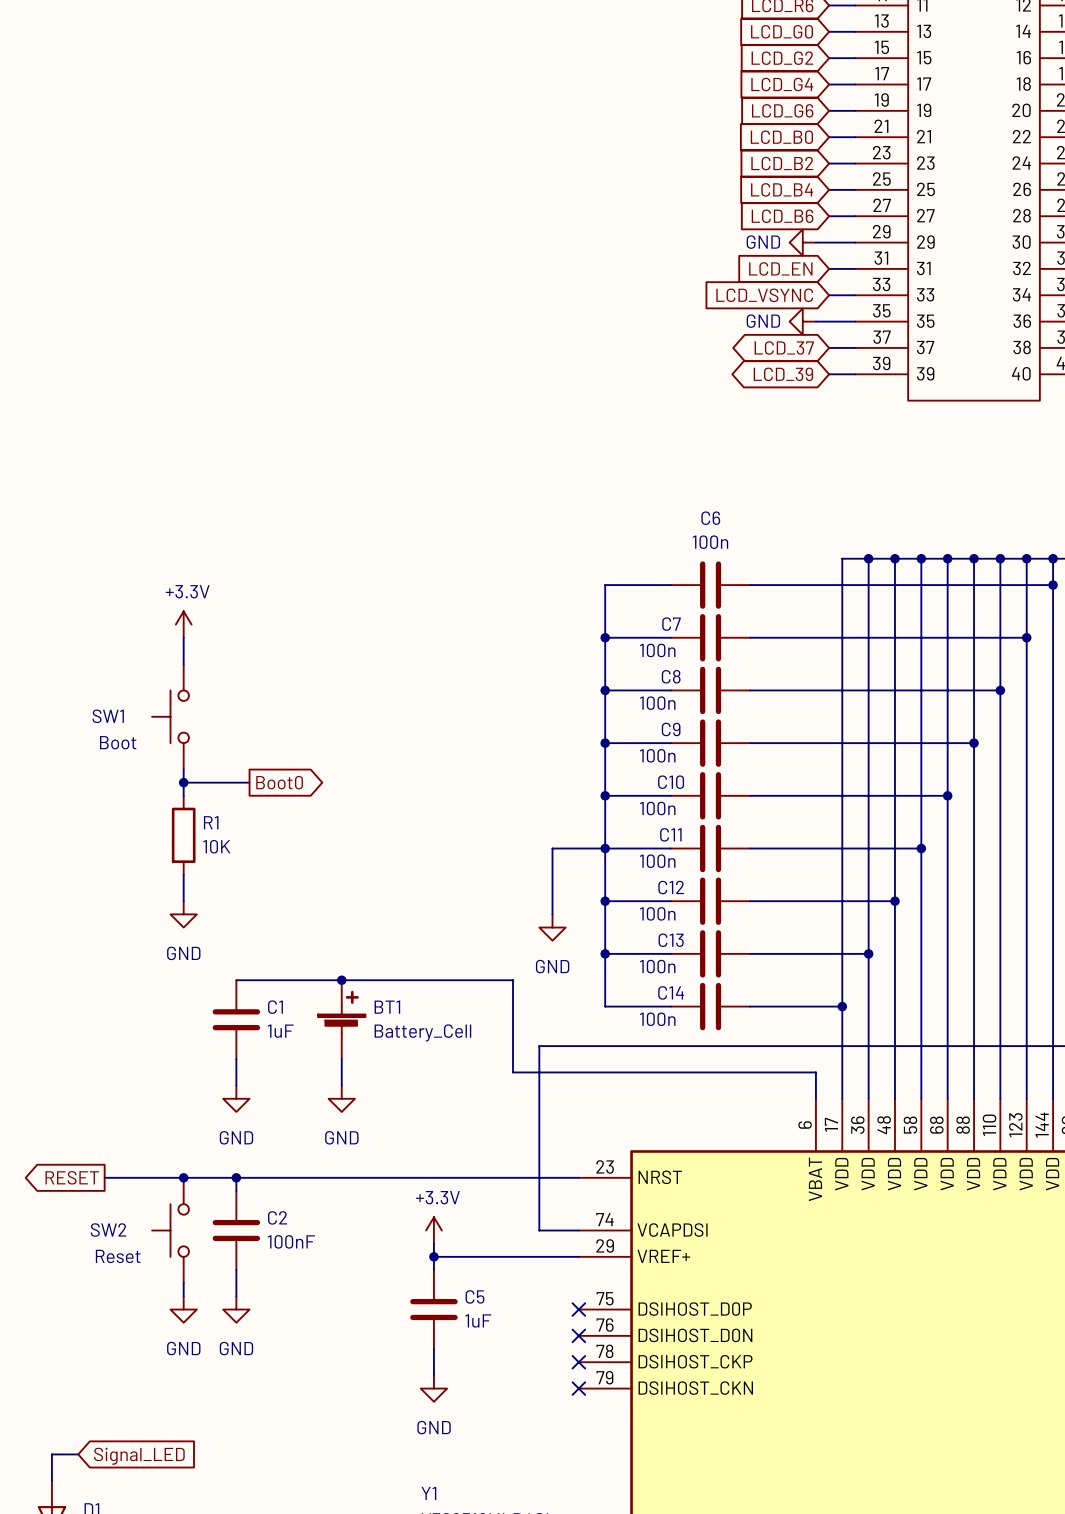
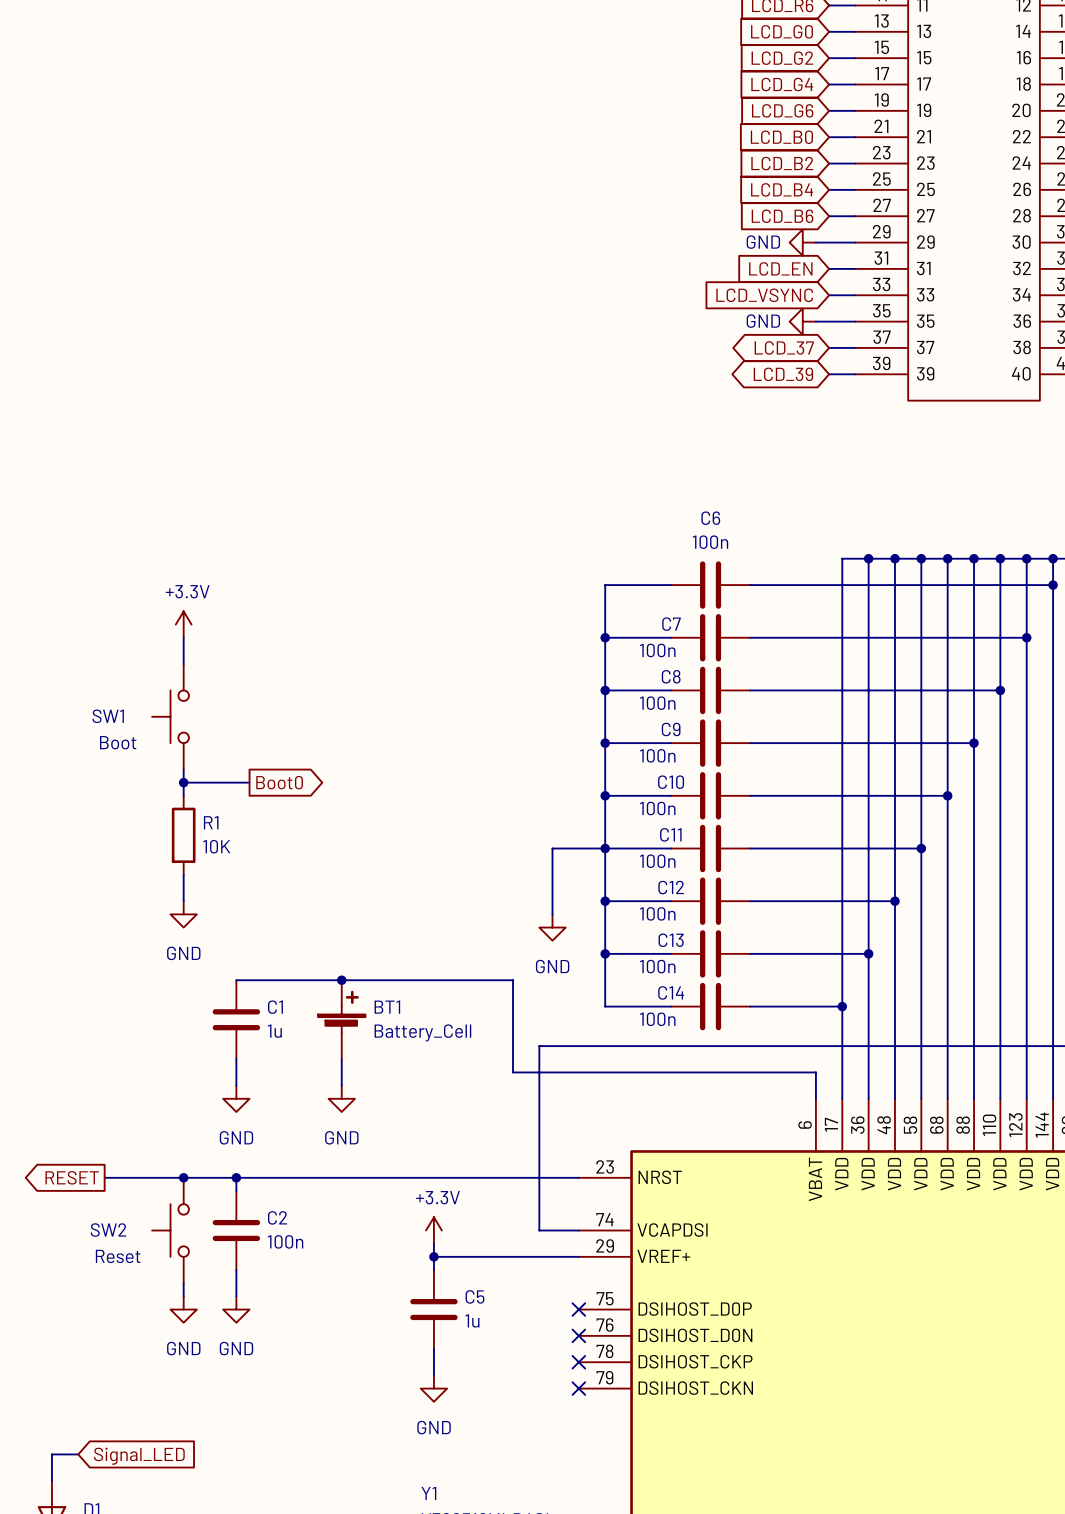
C1 value: 1uF (280, 1031) -> 1u (274, 1031)
C2 value: 100nF (291, 1241) -> 100n (285, 1241)
C5 value: 1uF (478, 1320) -> 1u (472, 1320)

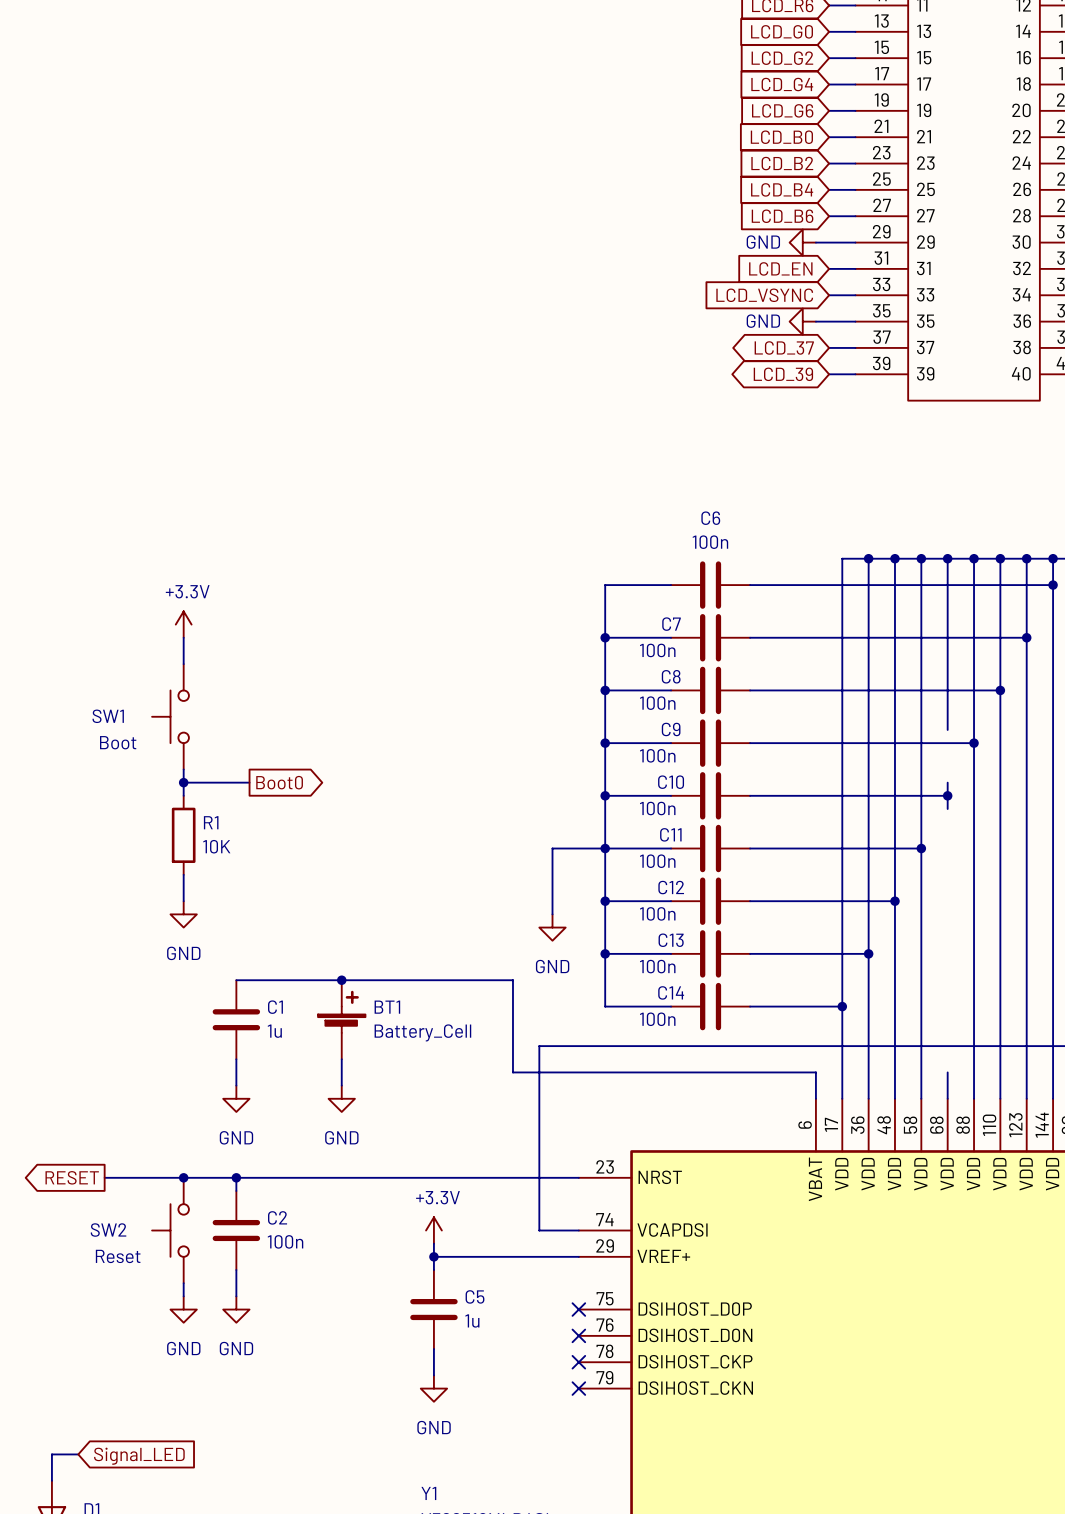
wire: (947, 729) (947, 782) -> none
wire: (947, 808) (947, 1072) -> none

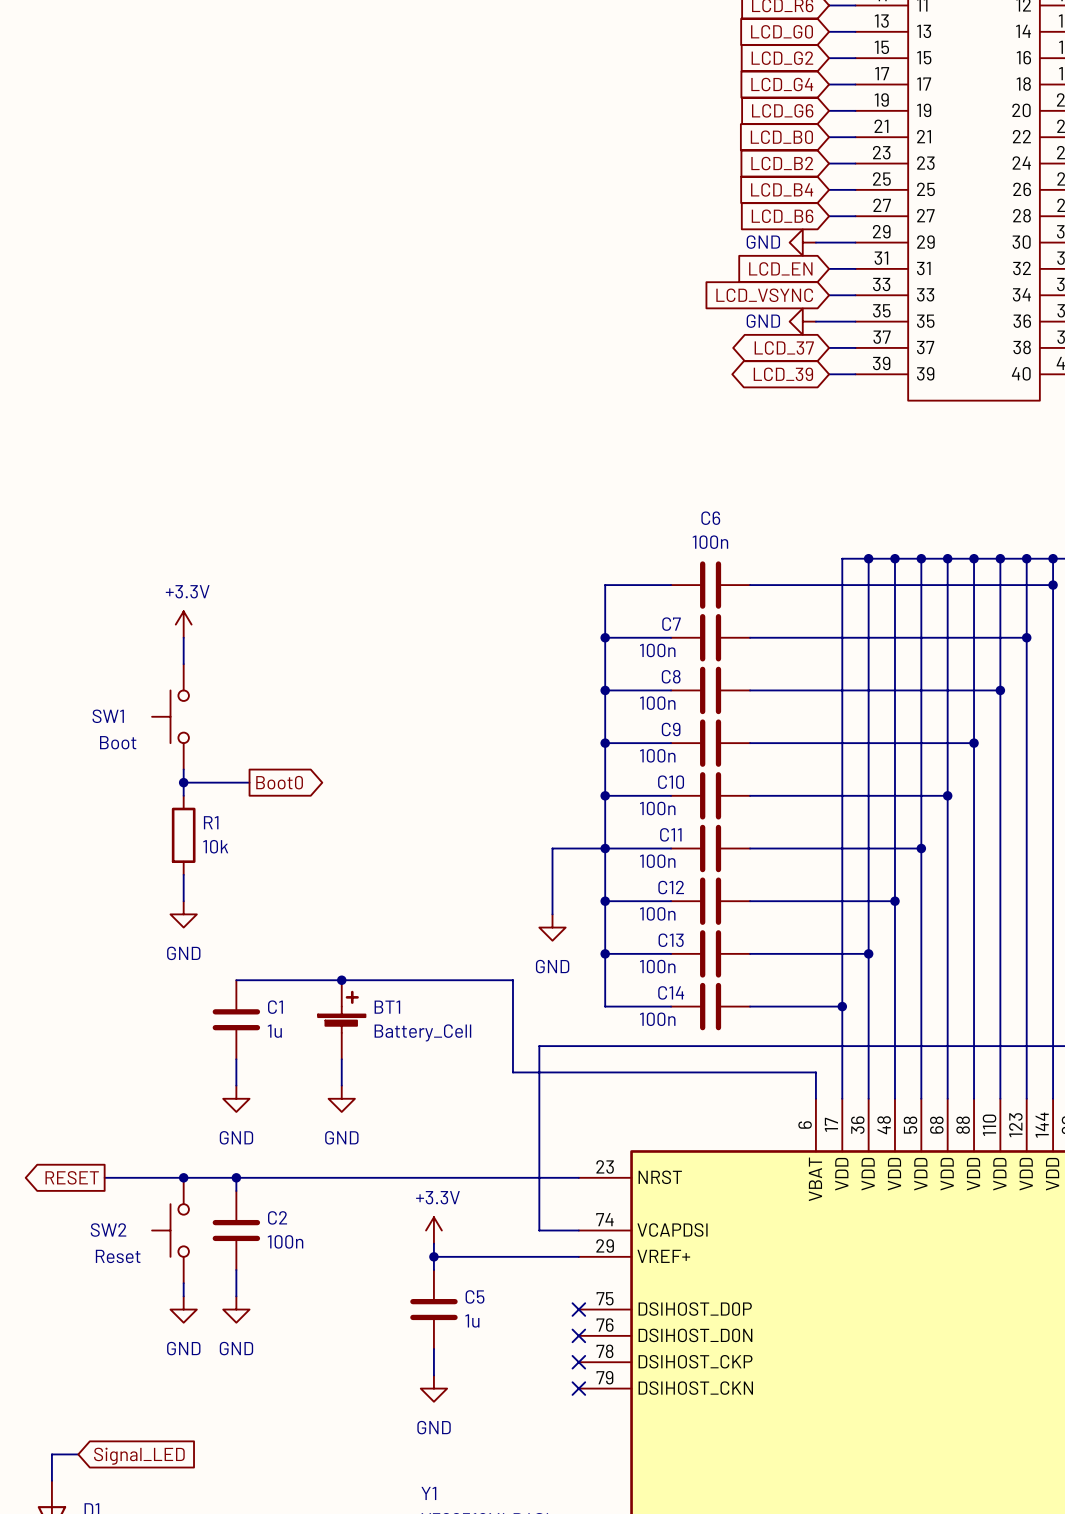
wire: none -> (947, 729) (947, 782)
wire: none -> (947, 808) (947, 1072)
R1 value: 10K (216, 846) -> 10k (215, 846)

